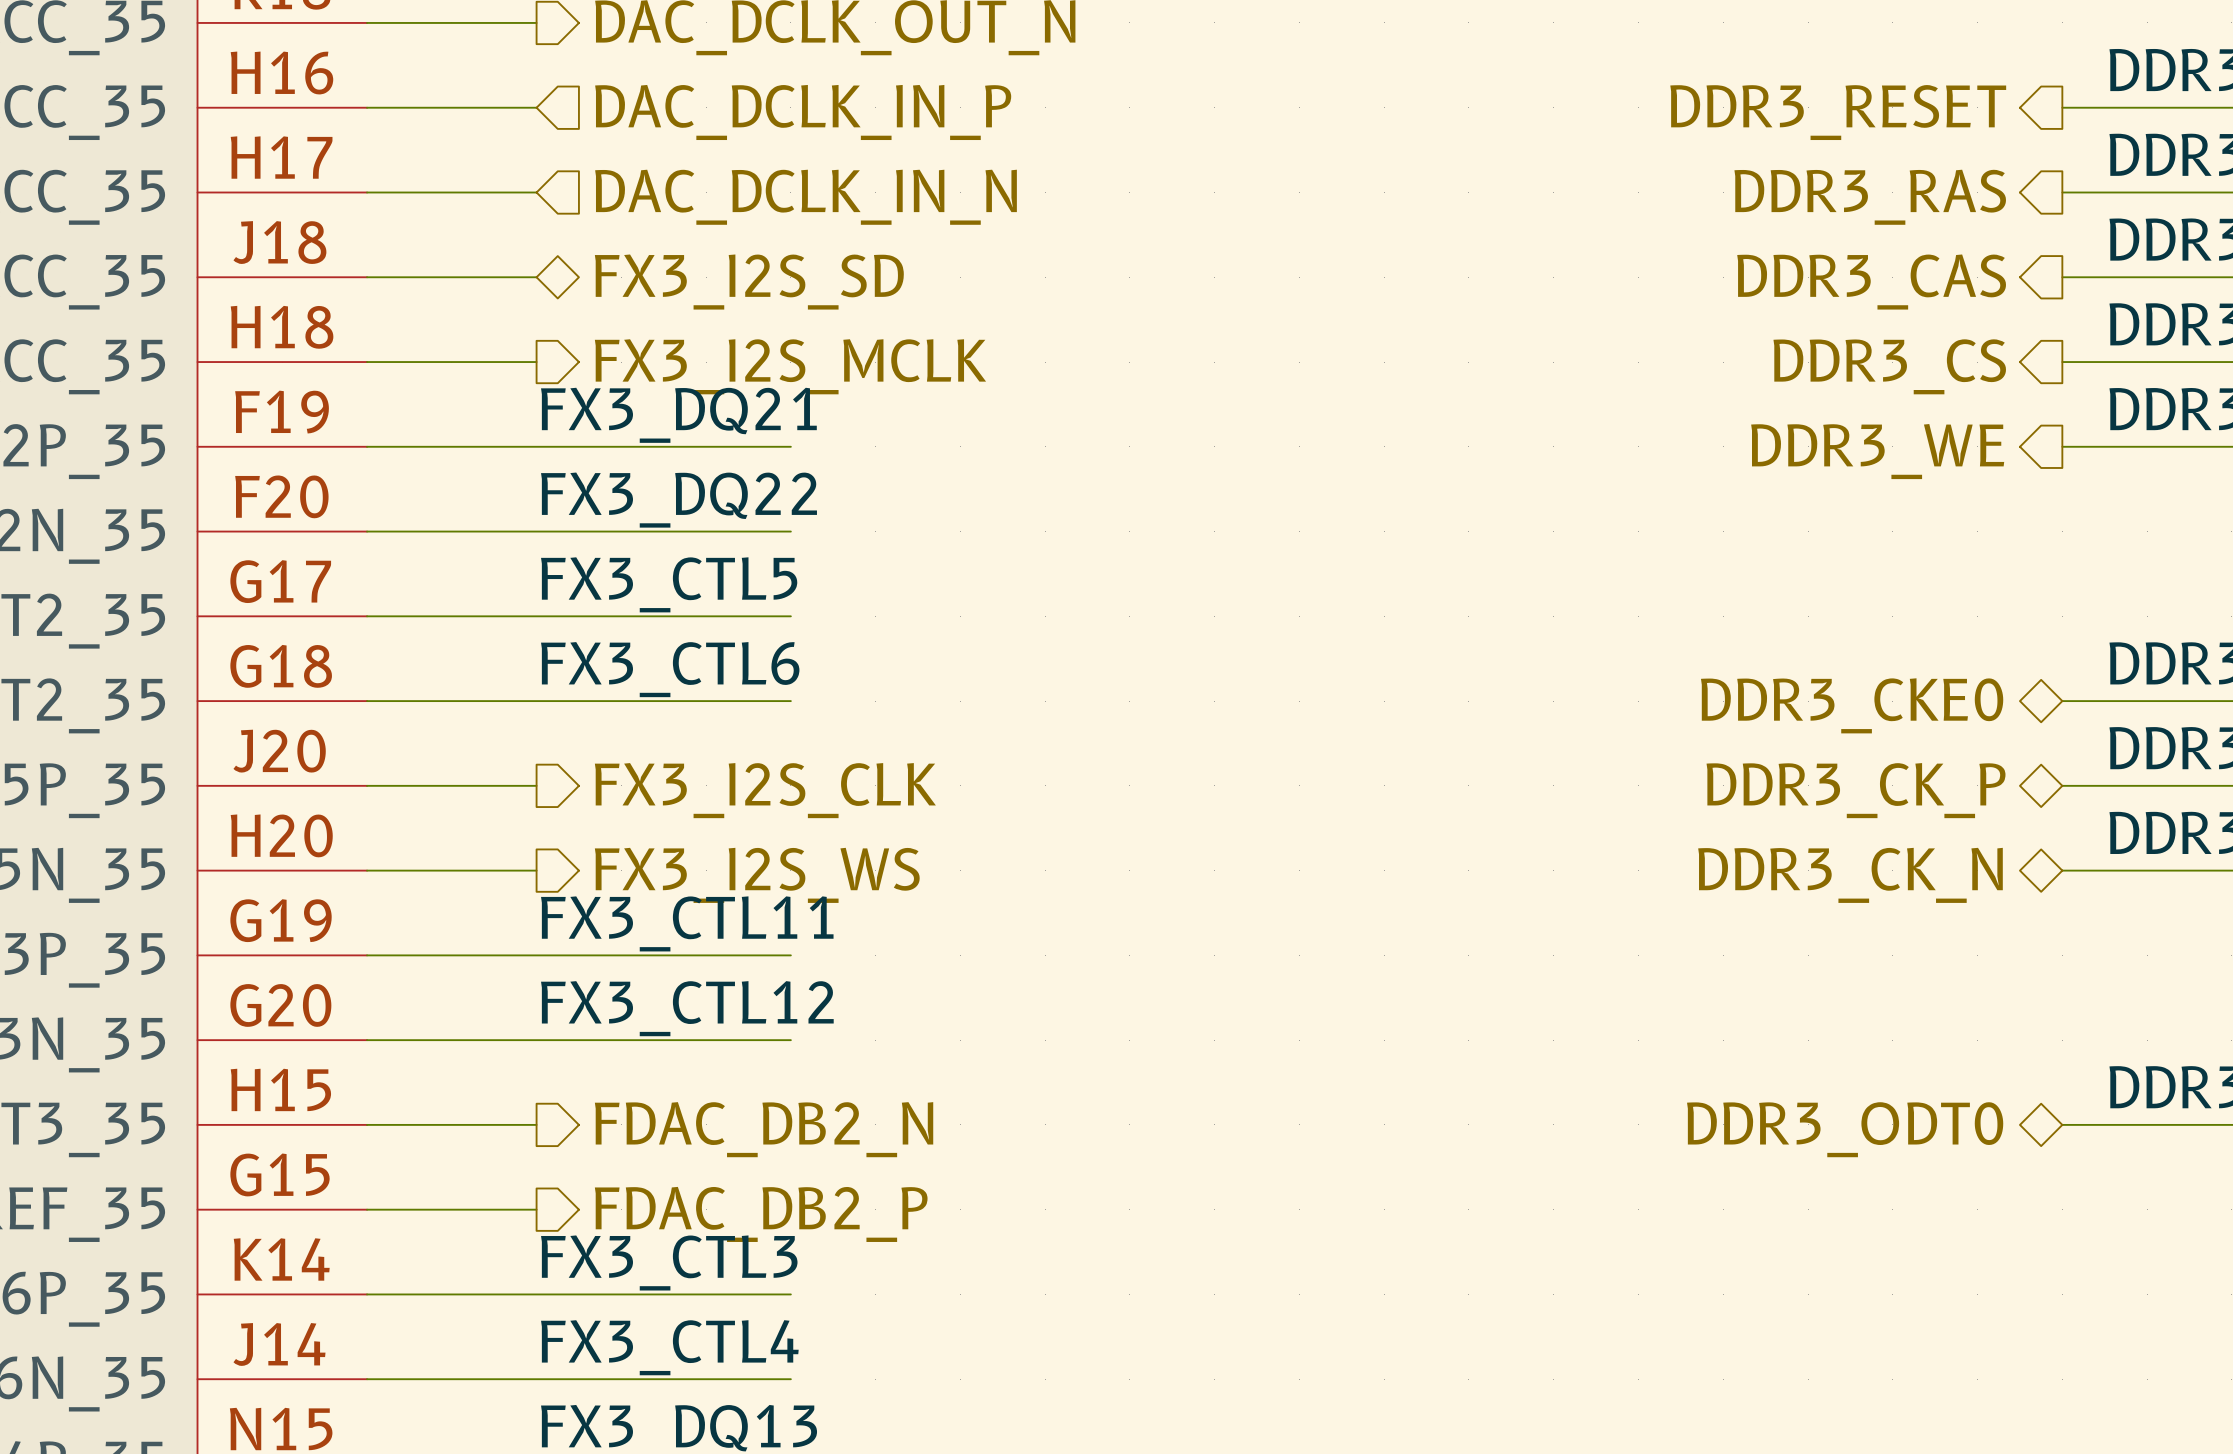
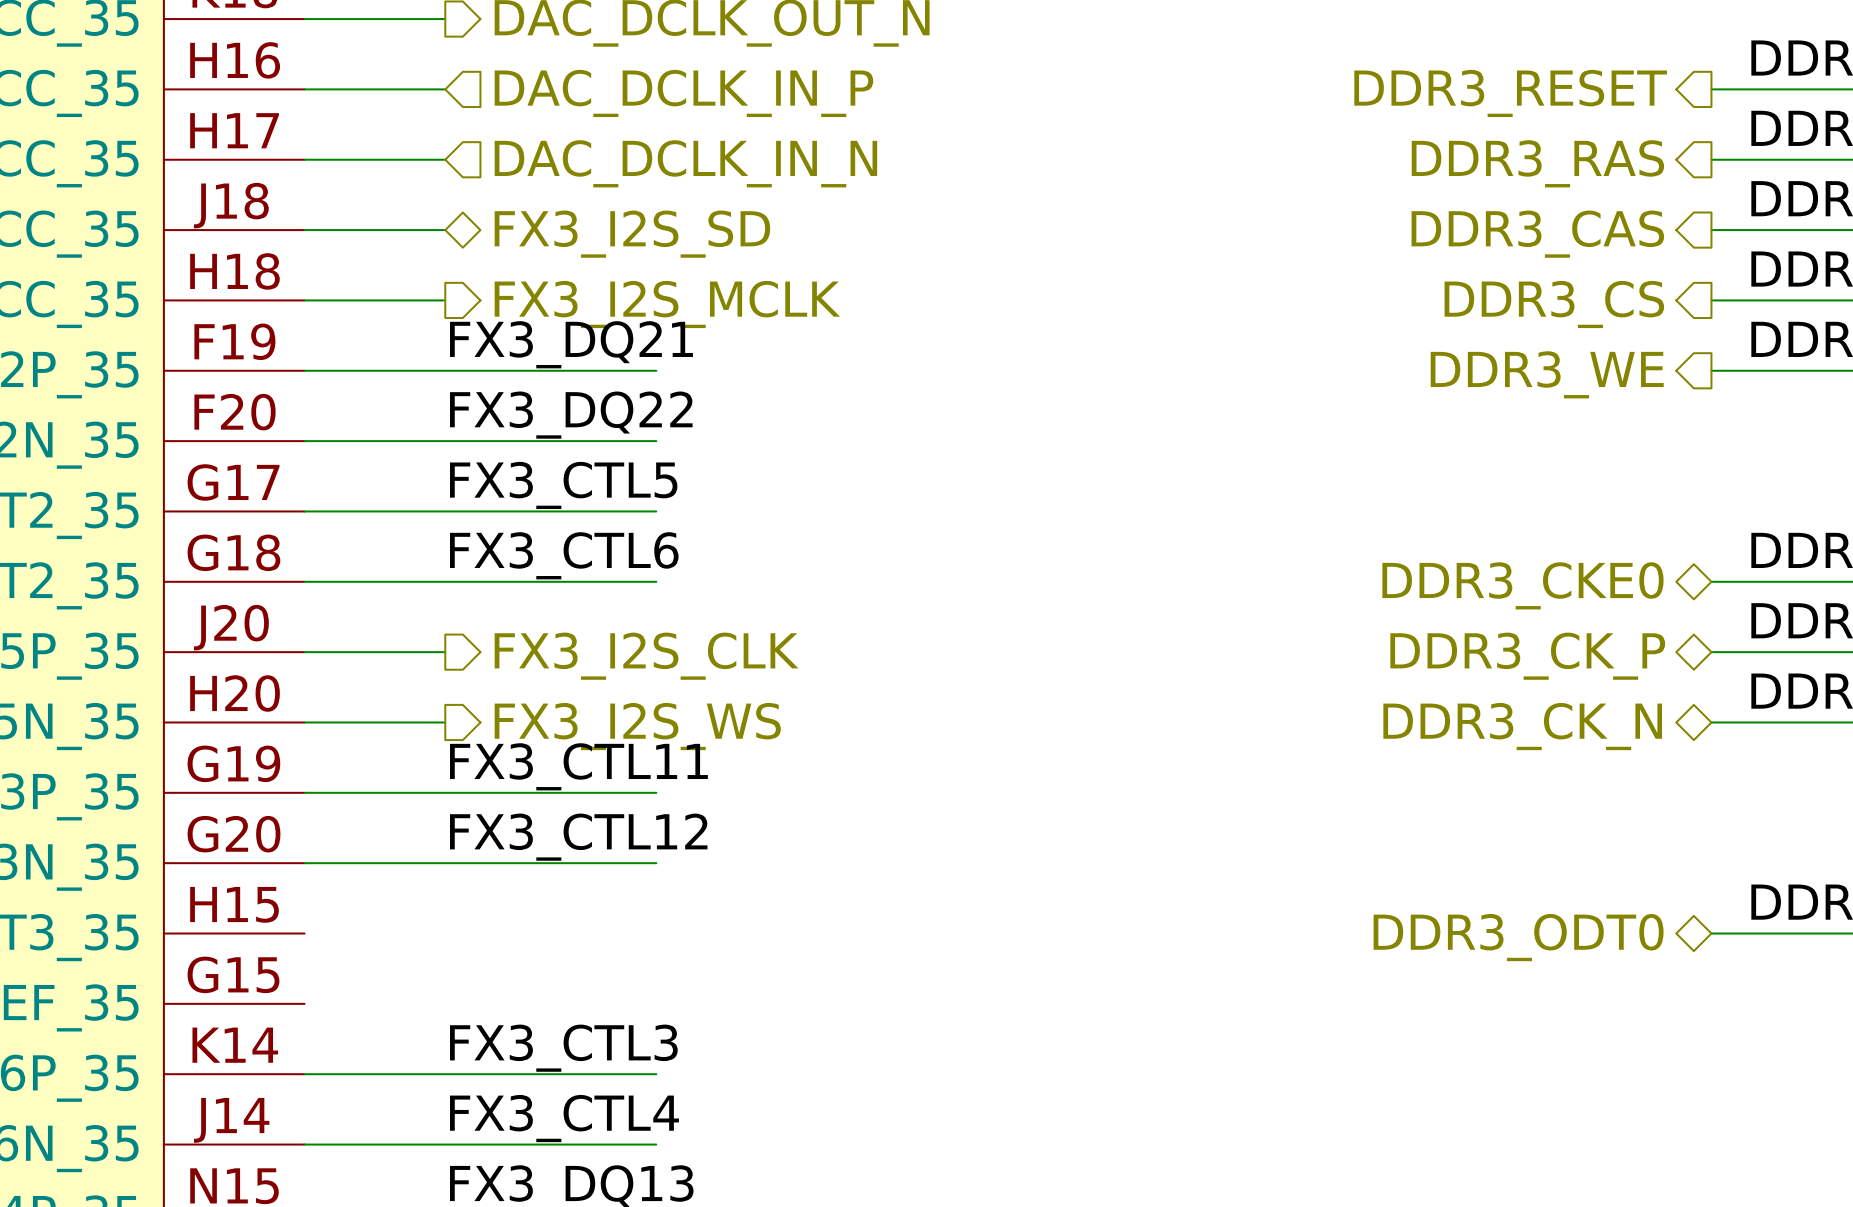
wire: (367, 1124) (536, 1124) -> none
hierarchical label: FDAC_DB2_N (764, 1129) -> none
wire: (367, 1209) (536, 1209) -> none
hierarchical label: FDAC_DB2_P (761, 1214) -> none

